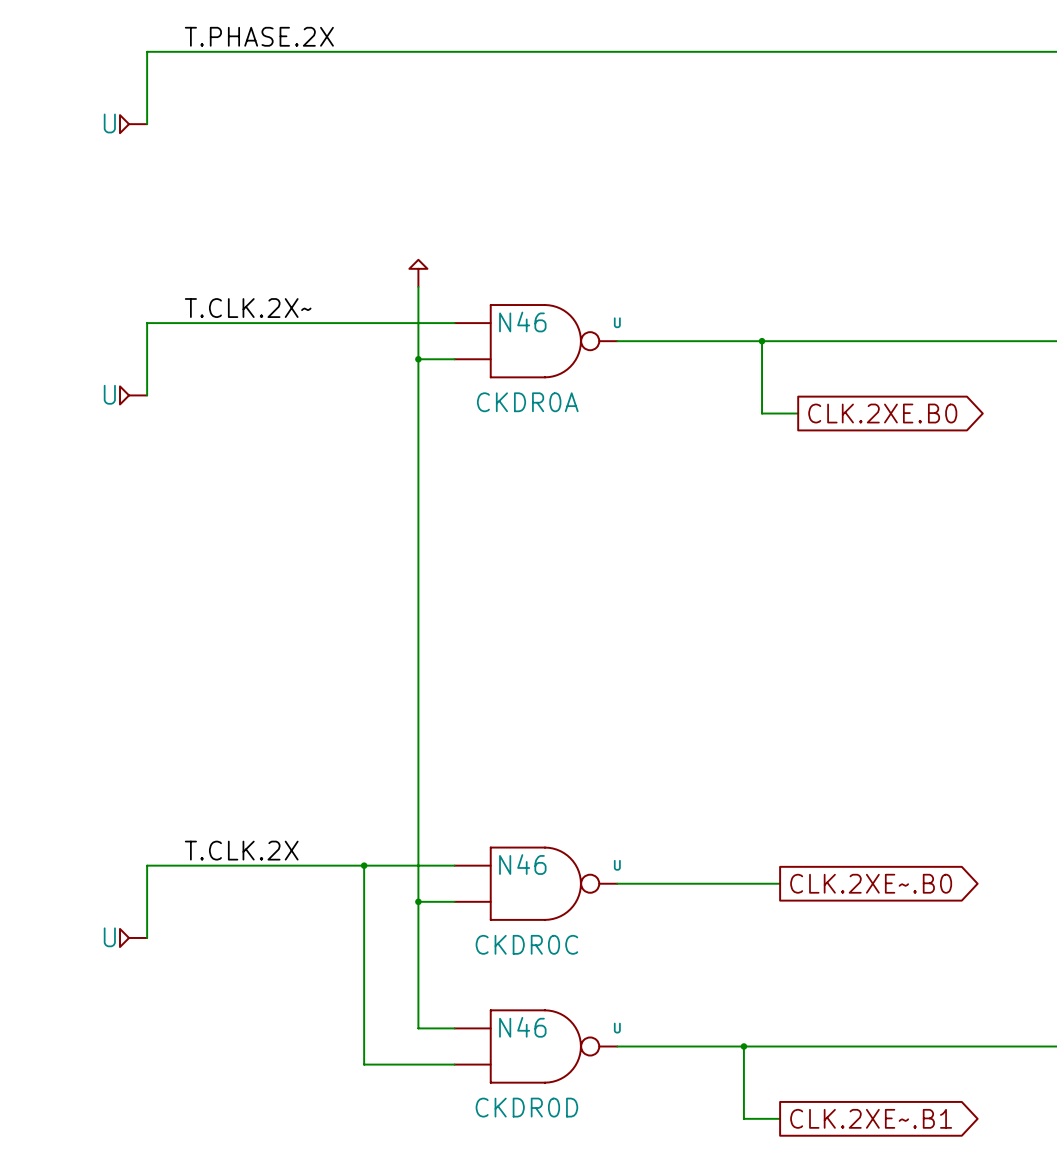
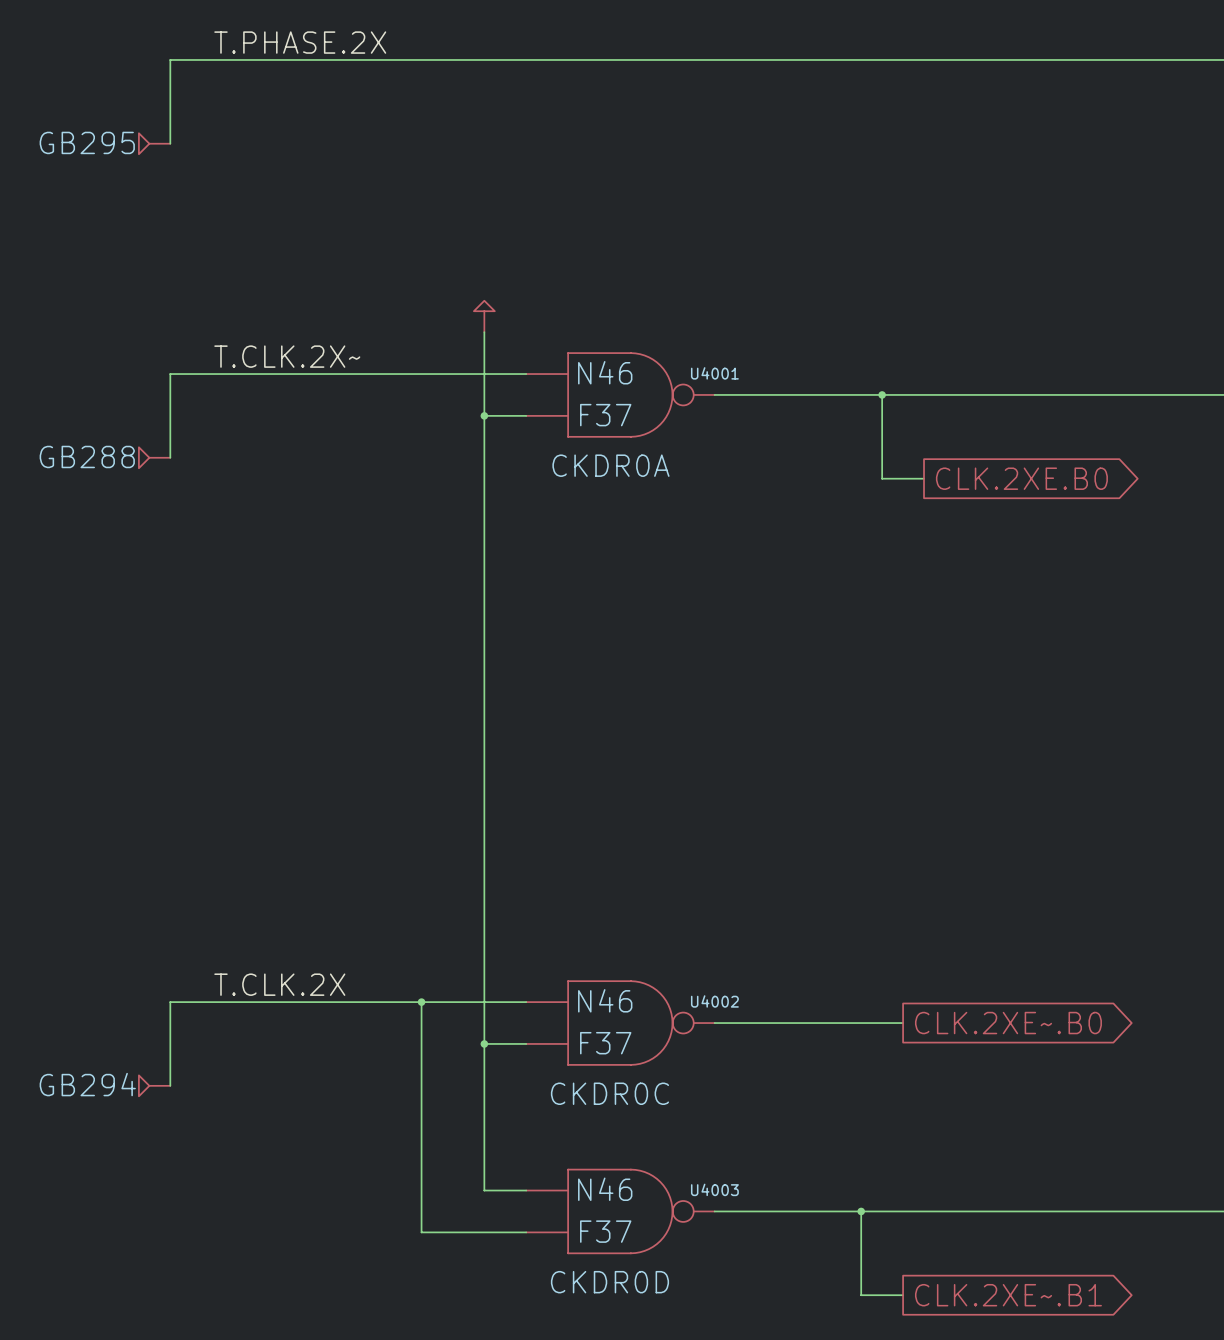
U name: U (109, 123) -> GB295 (87, 142)
U name: U (617, 322) -> U4001 (714, 373)
U value: none -> F37 (605, 415)
U name: U (109, 394) -> GB288 (87, 456)
U name: U (617, 865) -> U4002 (714, 1001)
U value: none -> F37 (605, 1043)
U name: U (109, 937) -> GB294 (87, 1084)
U name: U (617, 1028) -> U4003 (714, 1189)
U value: none -> F37 (605, 1231)

